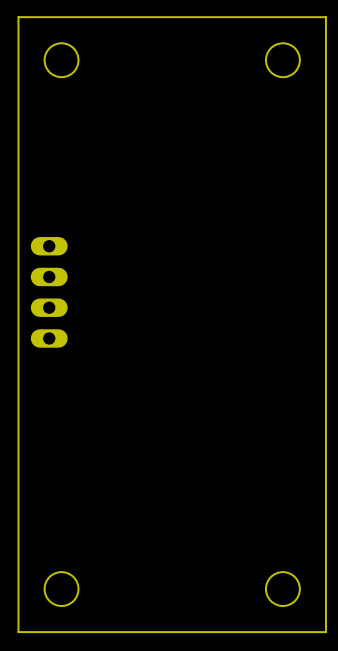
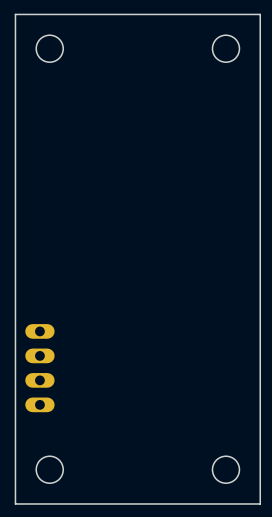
part position: (49, 292) -> (39, 368)

